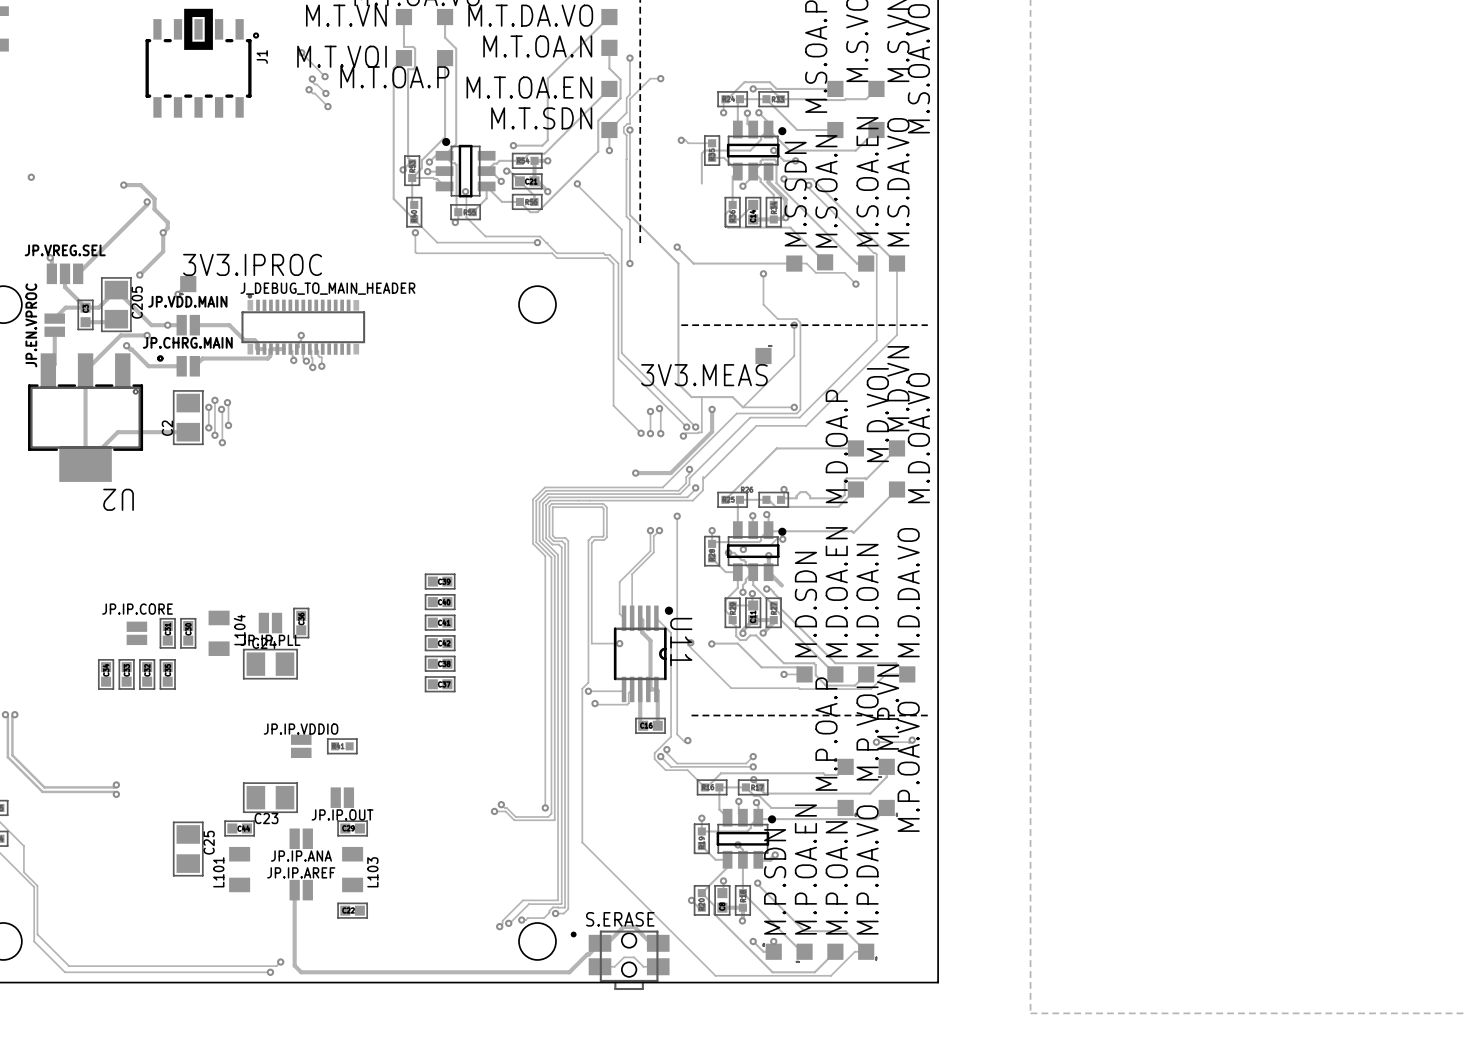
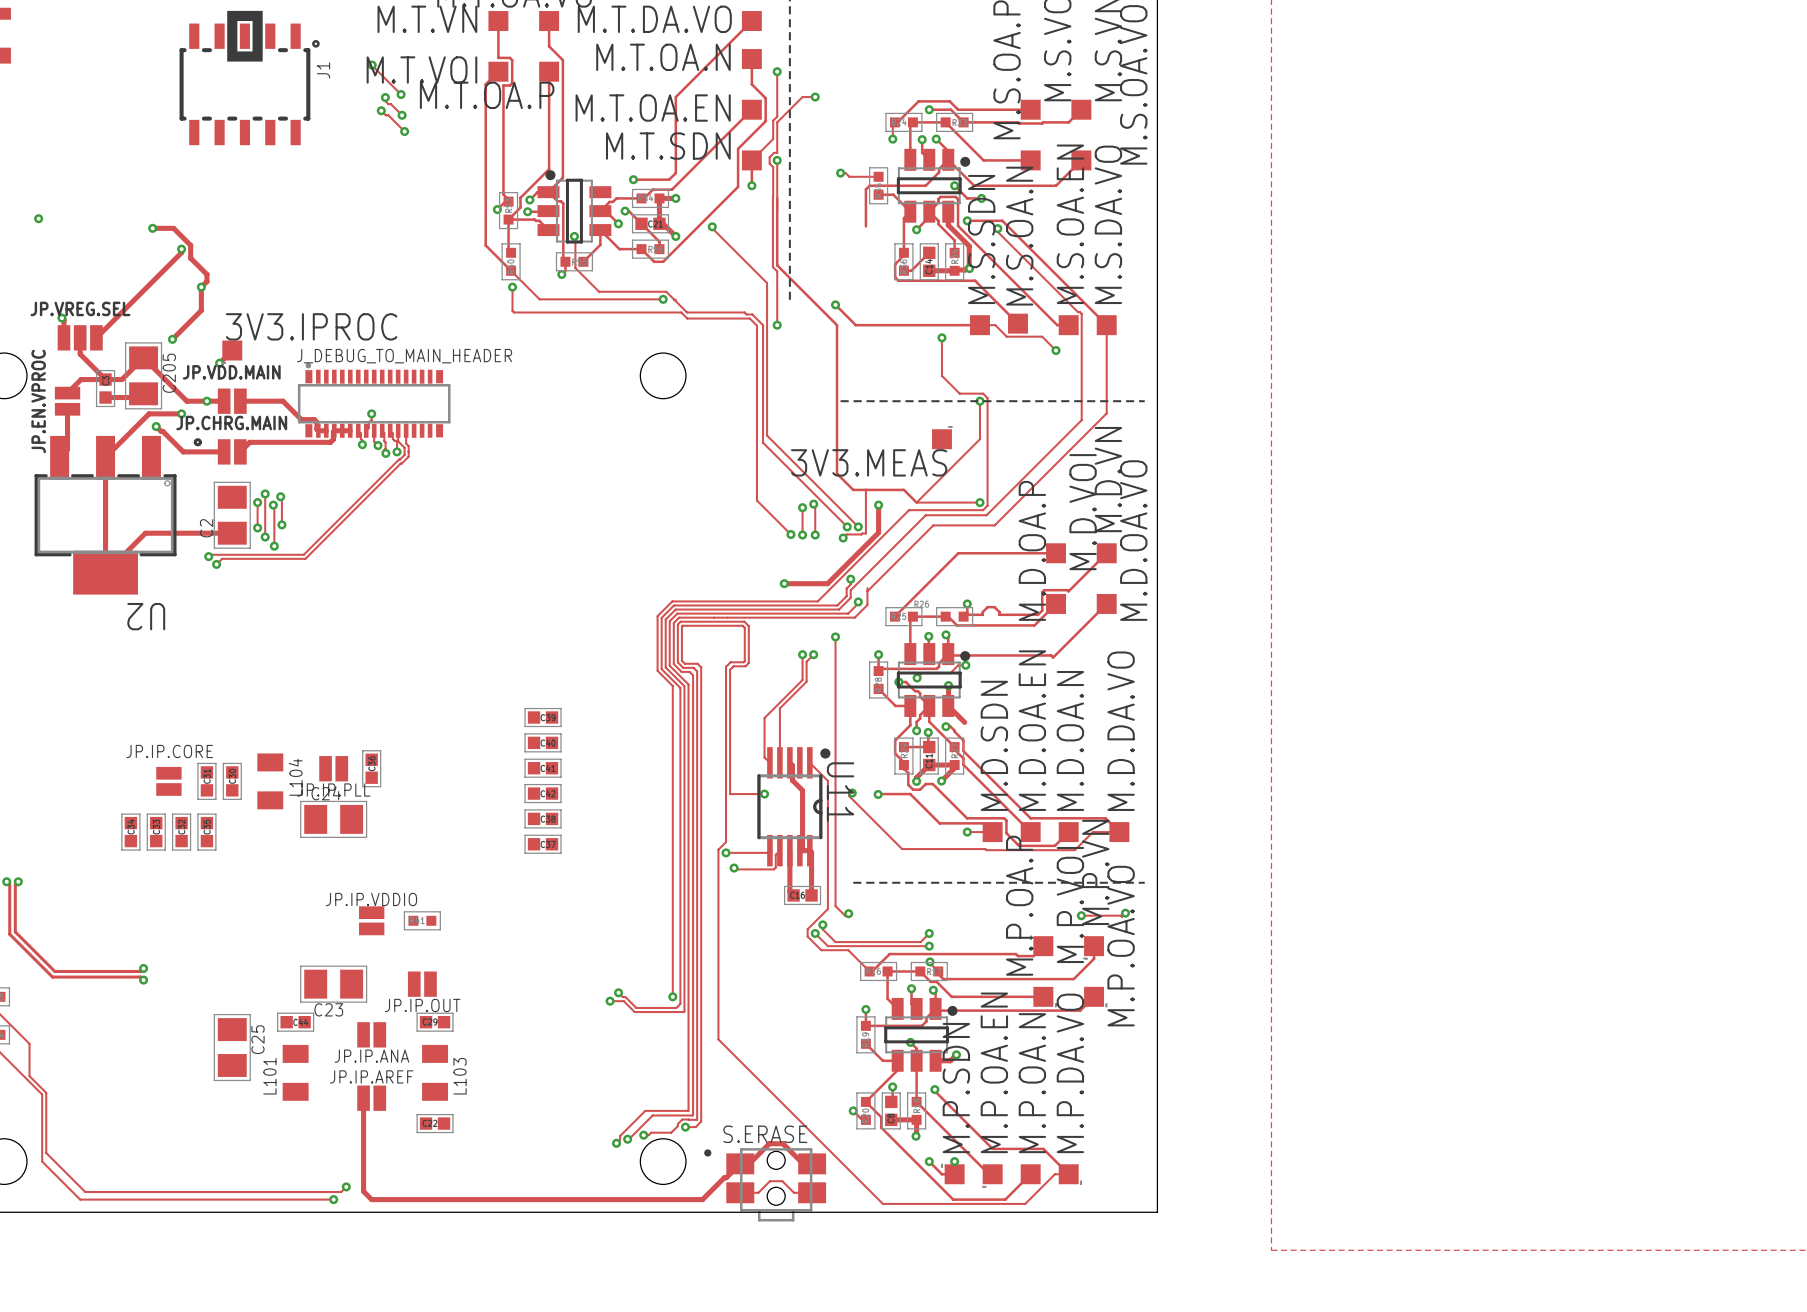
track: none -> (398, 430) (398, 441) (404, 447) (404, 455) (303, 554) (210, 554) (208, 556)
track: none -> (406, 430) (408, 456) (305, 558) (222, 558) (216, 564)
via: none -> (208, 556)
via: none -> (216, 564)

